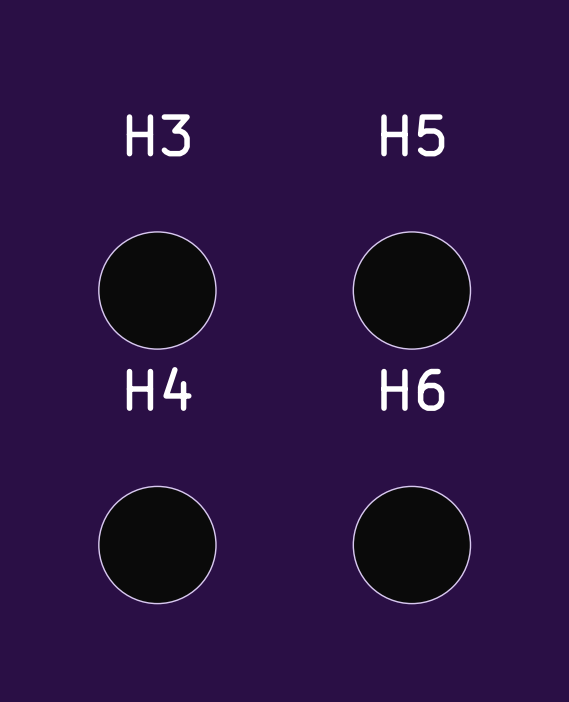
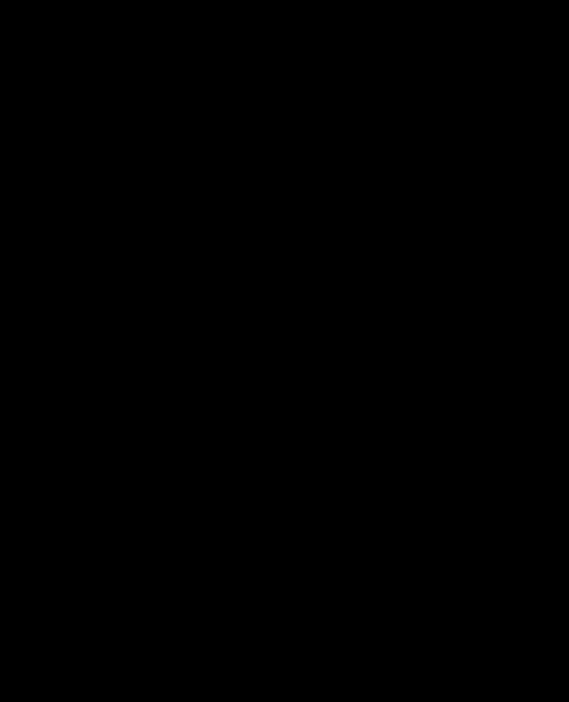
H3: (157, 290) -> none
H5: (411, 290) -> none
H4: (157, 545) -> none
H6: (411, 545) -> none

